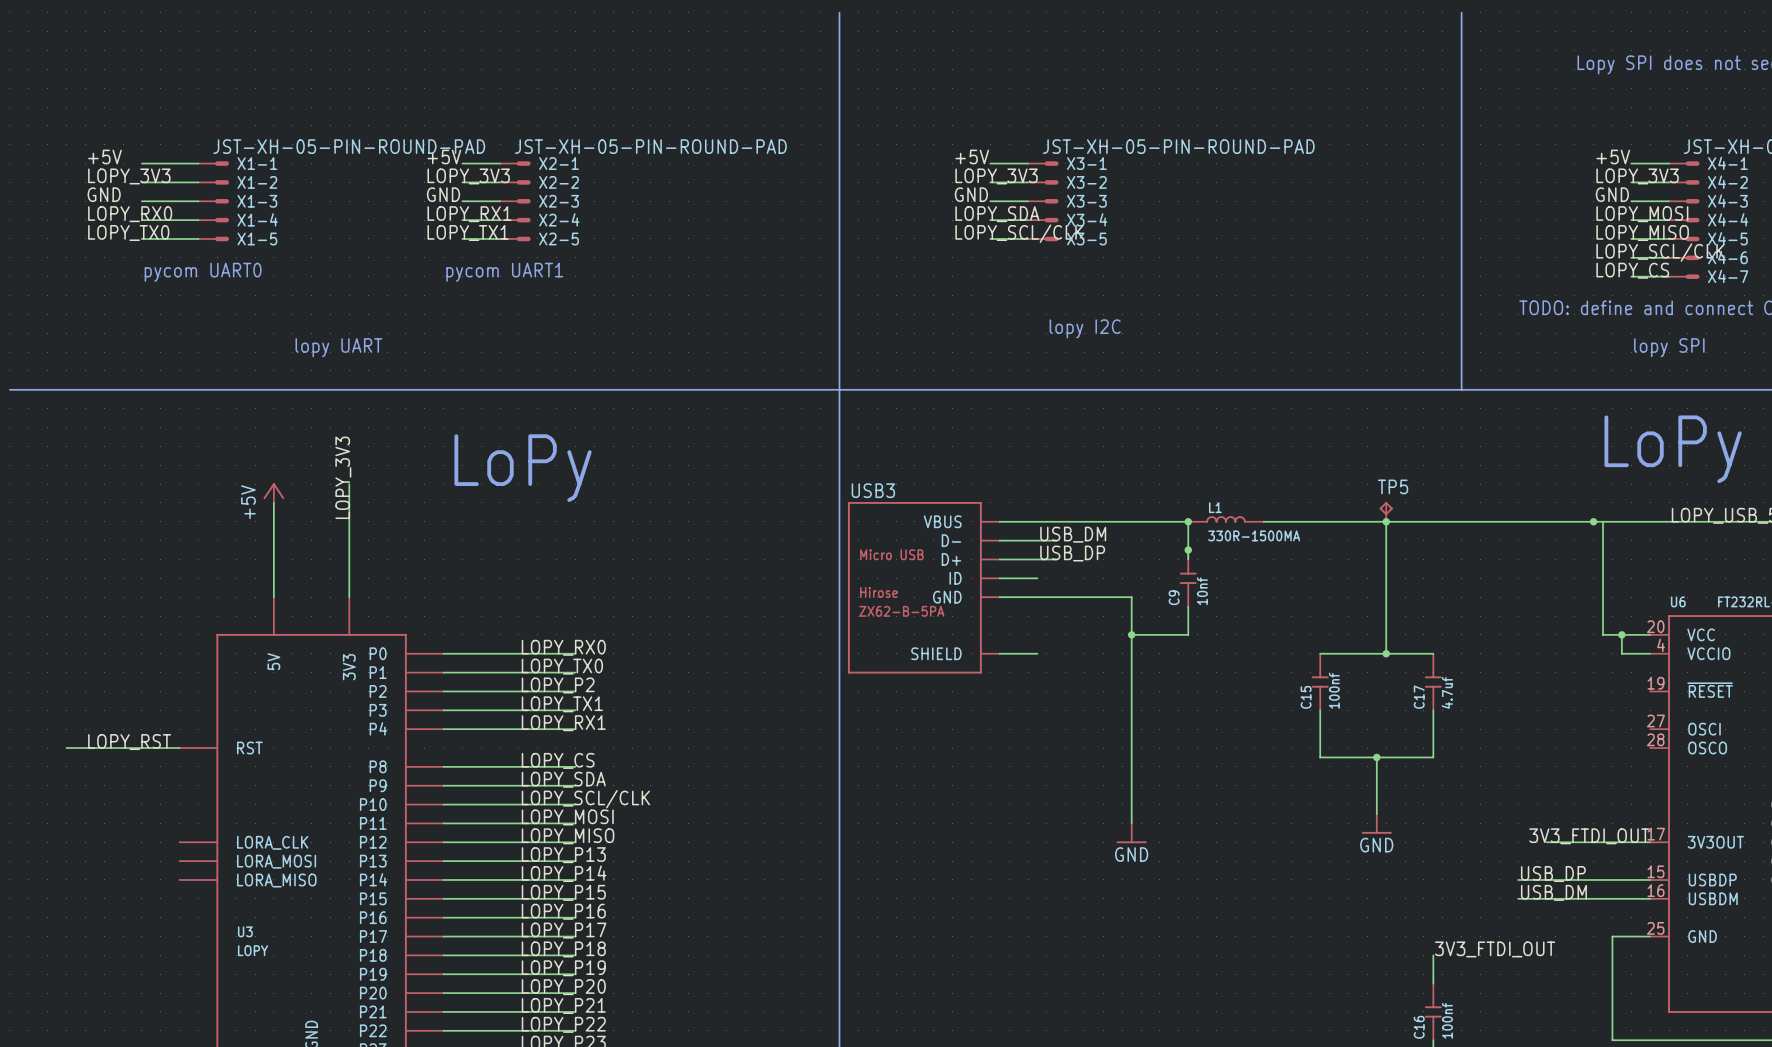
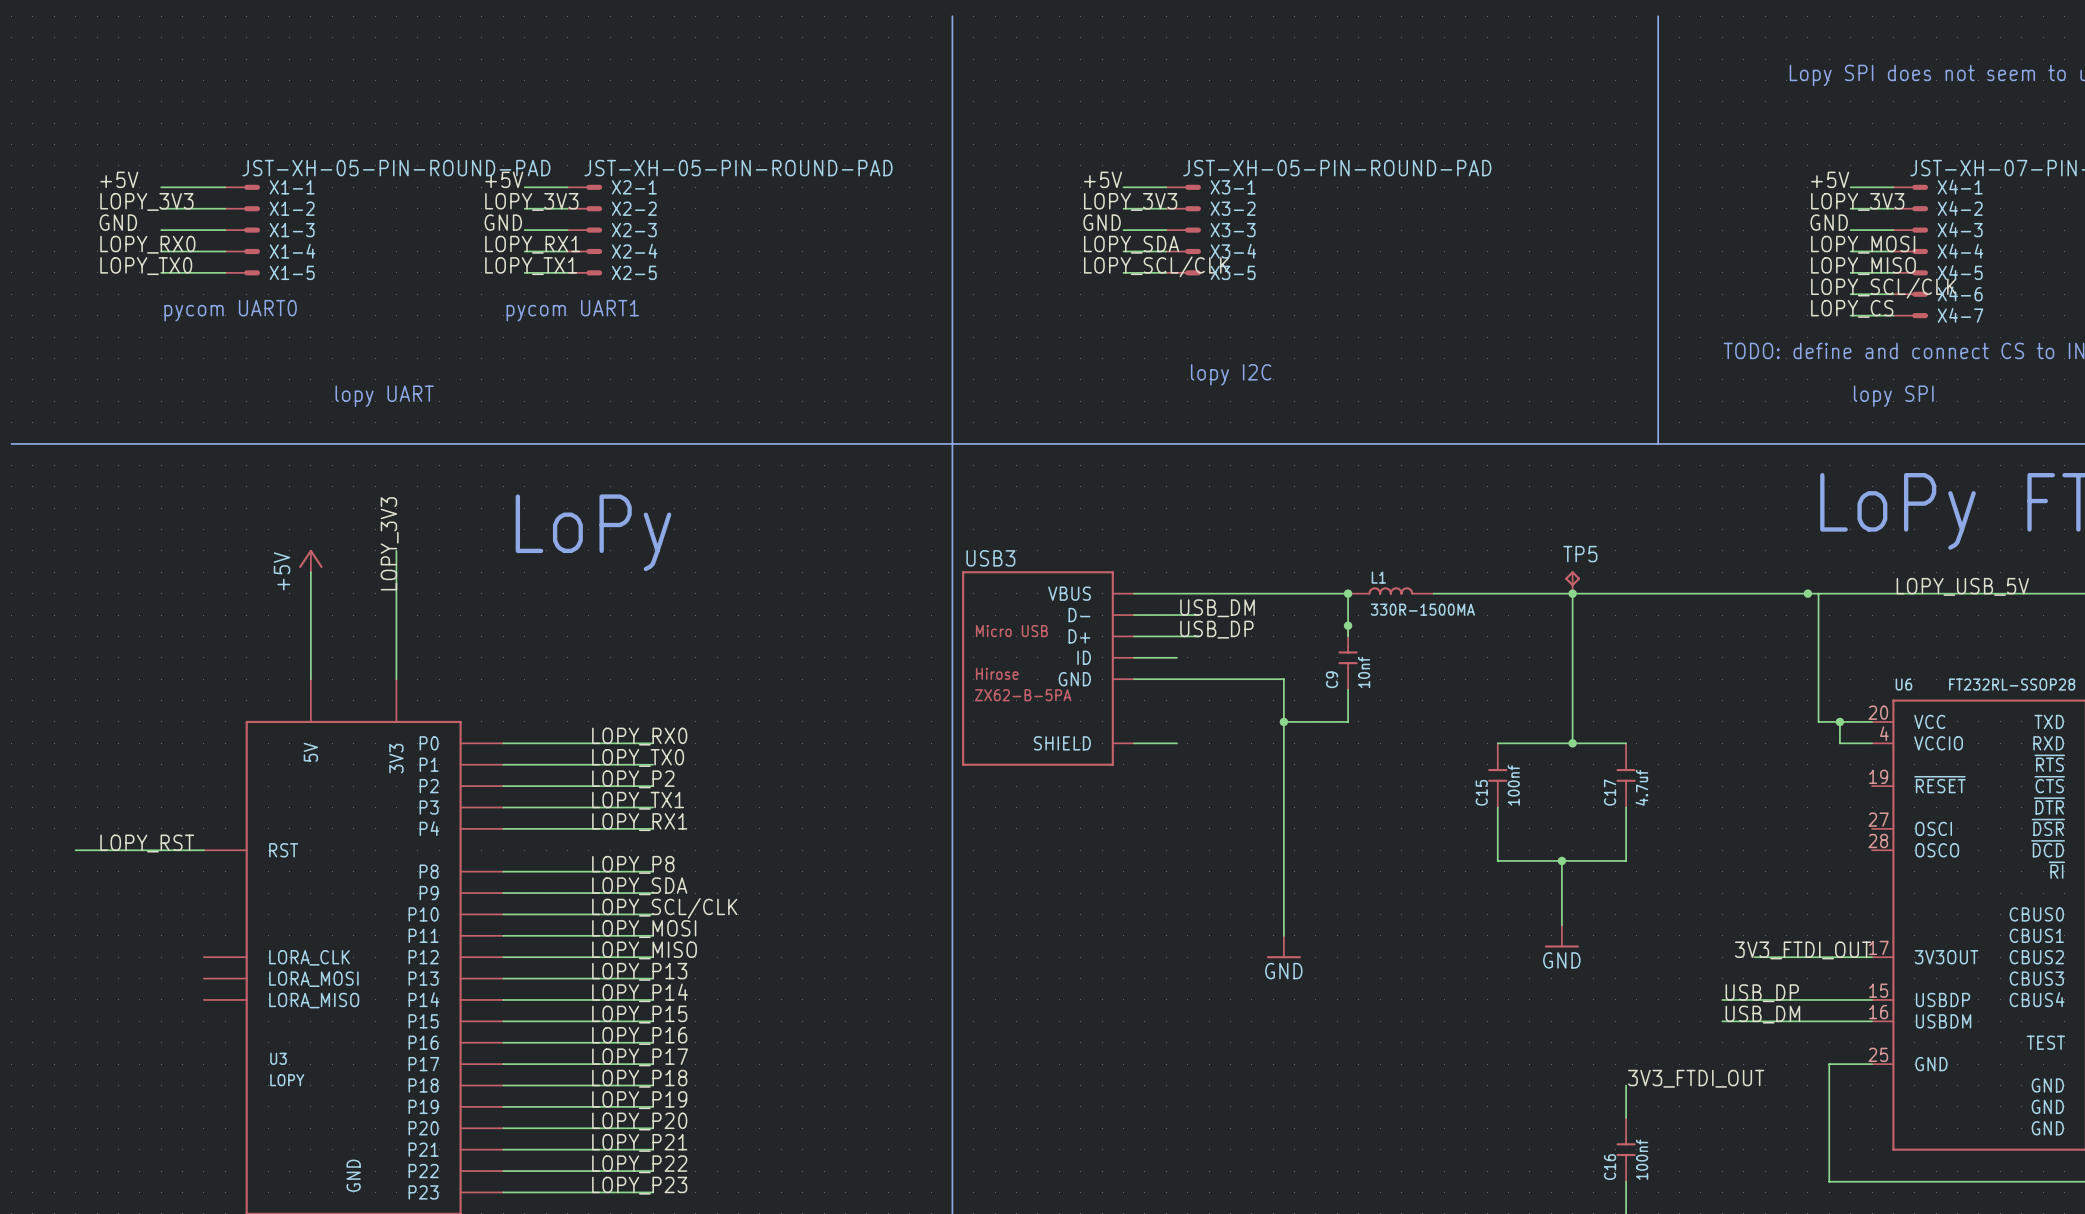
label: LOPY_CS (558, 760) -> LOPY_P8 (633, 864)

